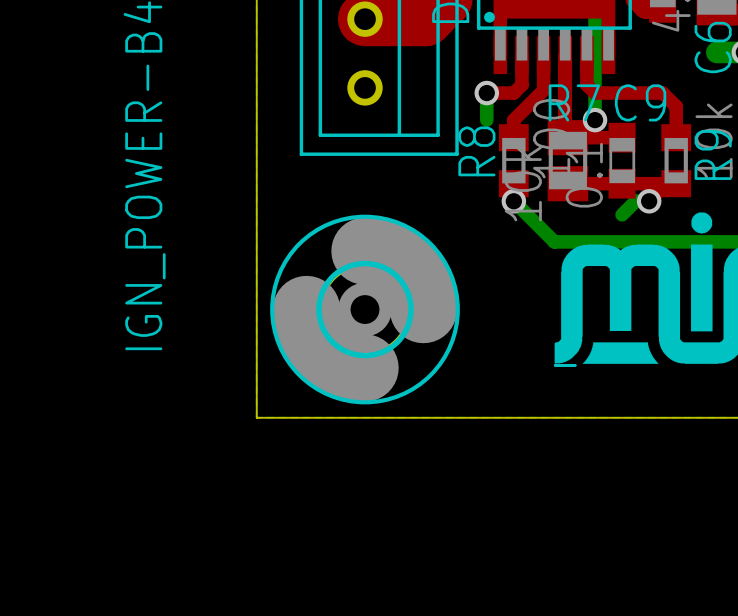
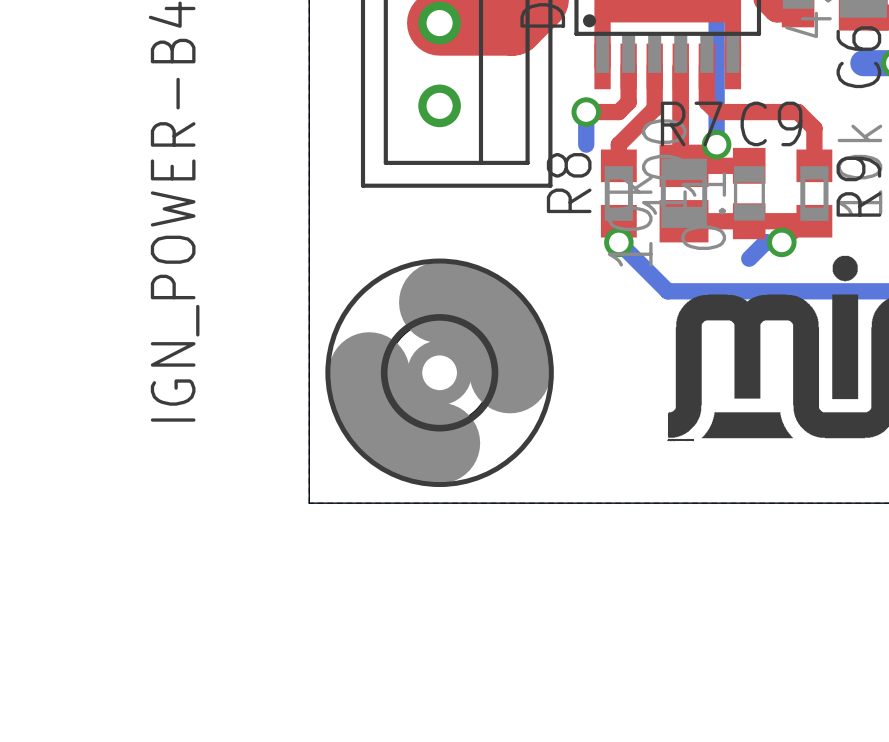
R8 name position: R8 (476, 151) -> R8 (569, 183)

